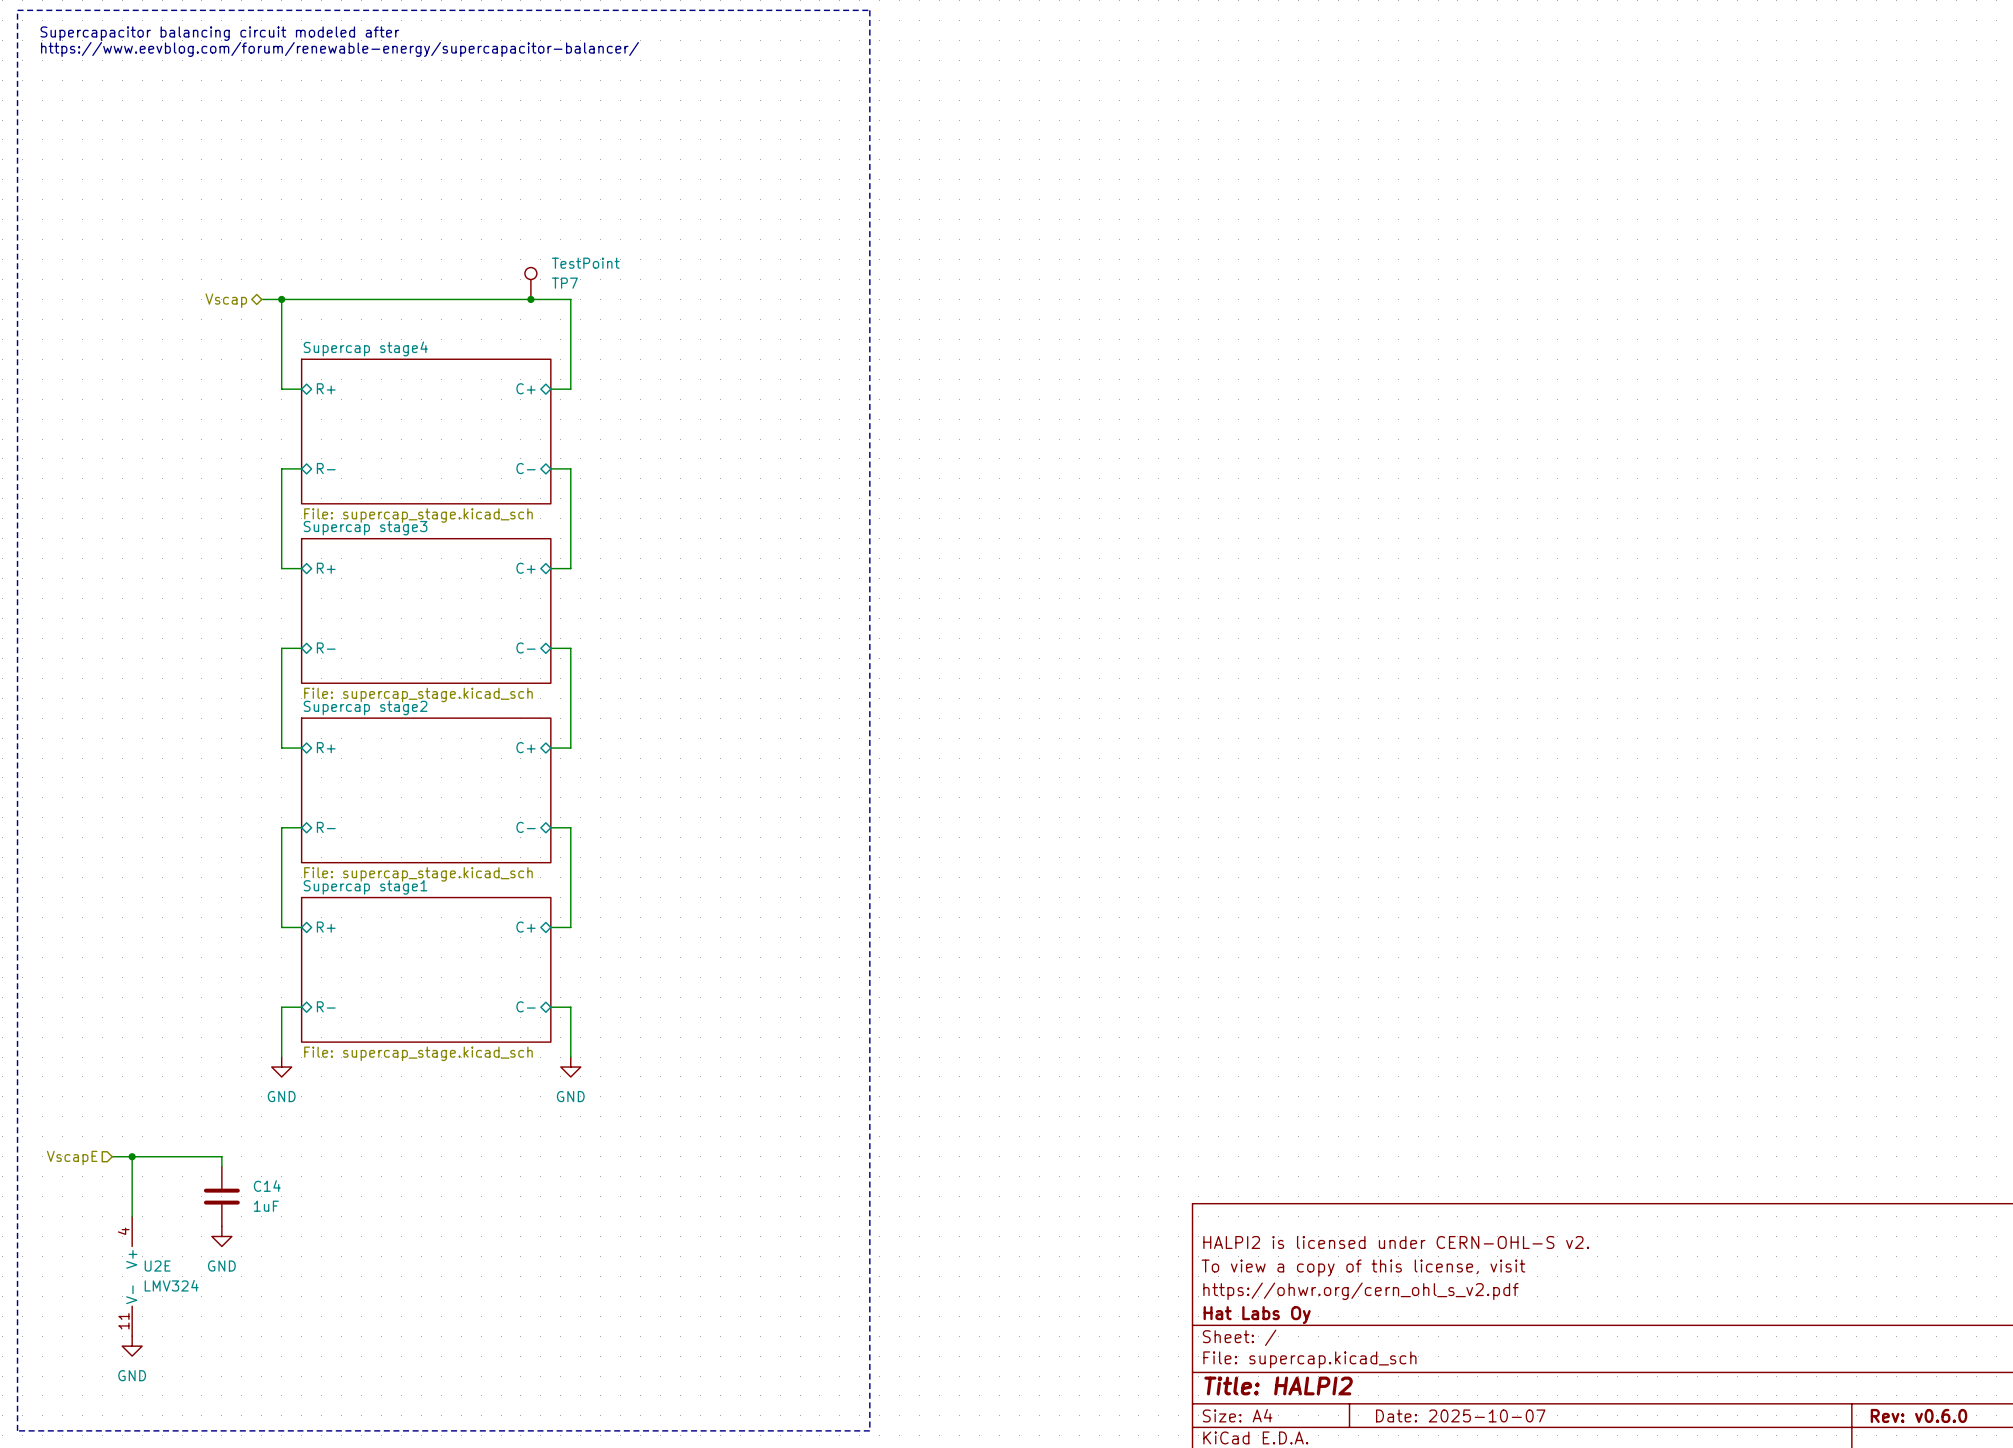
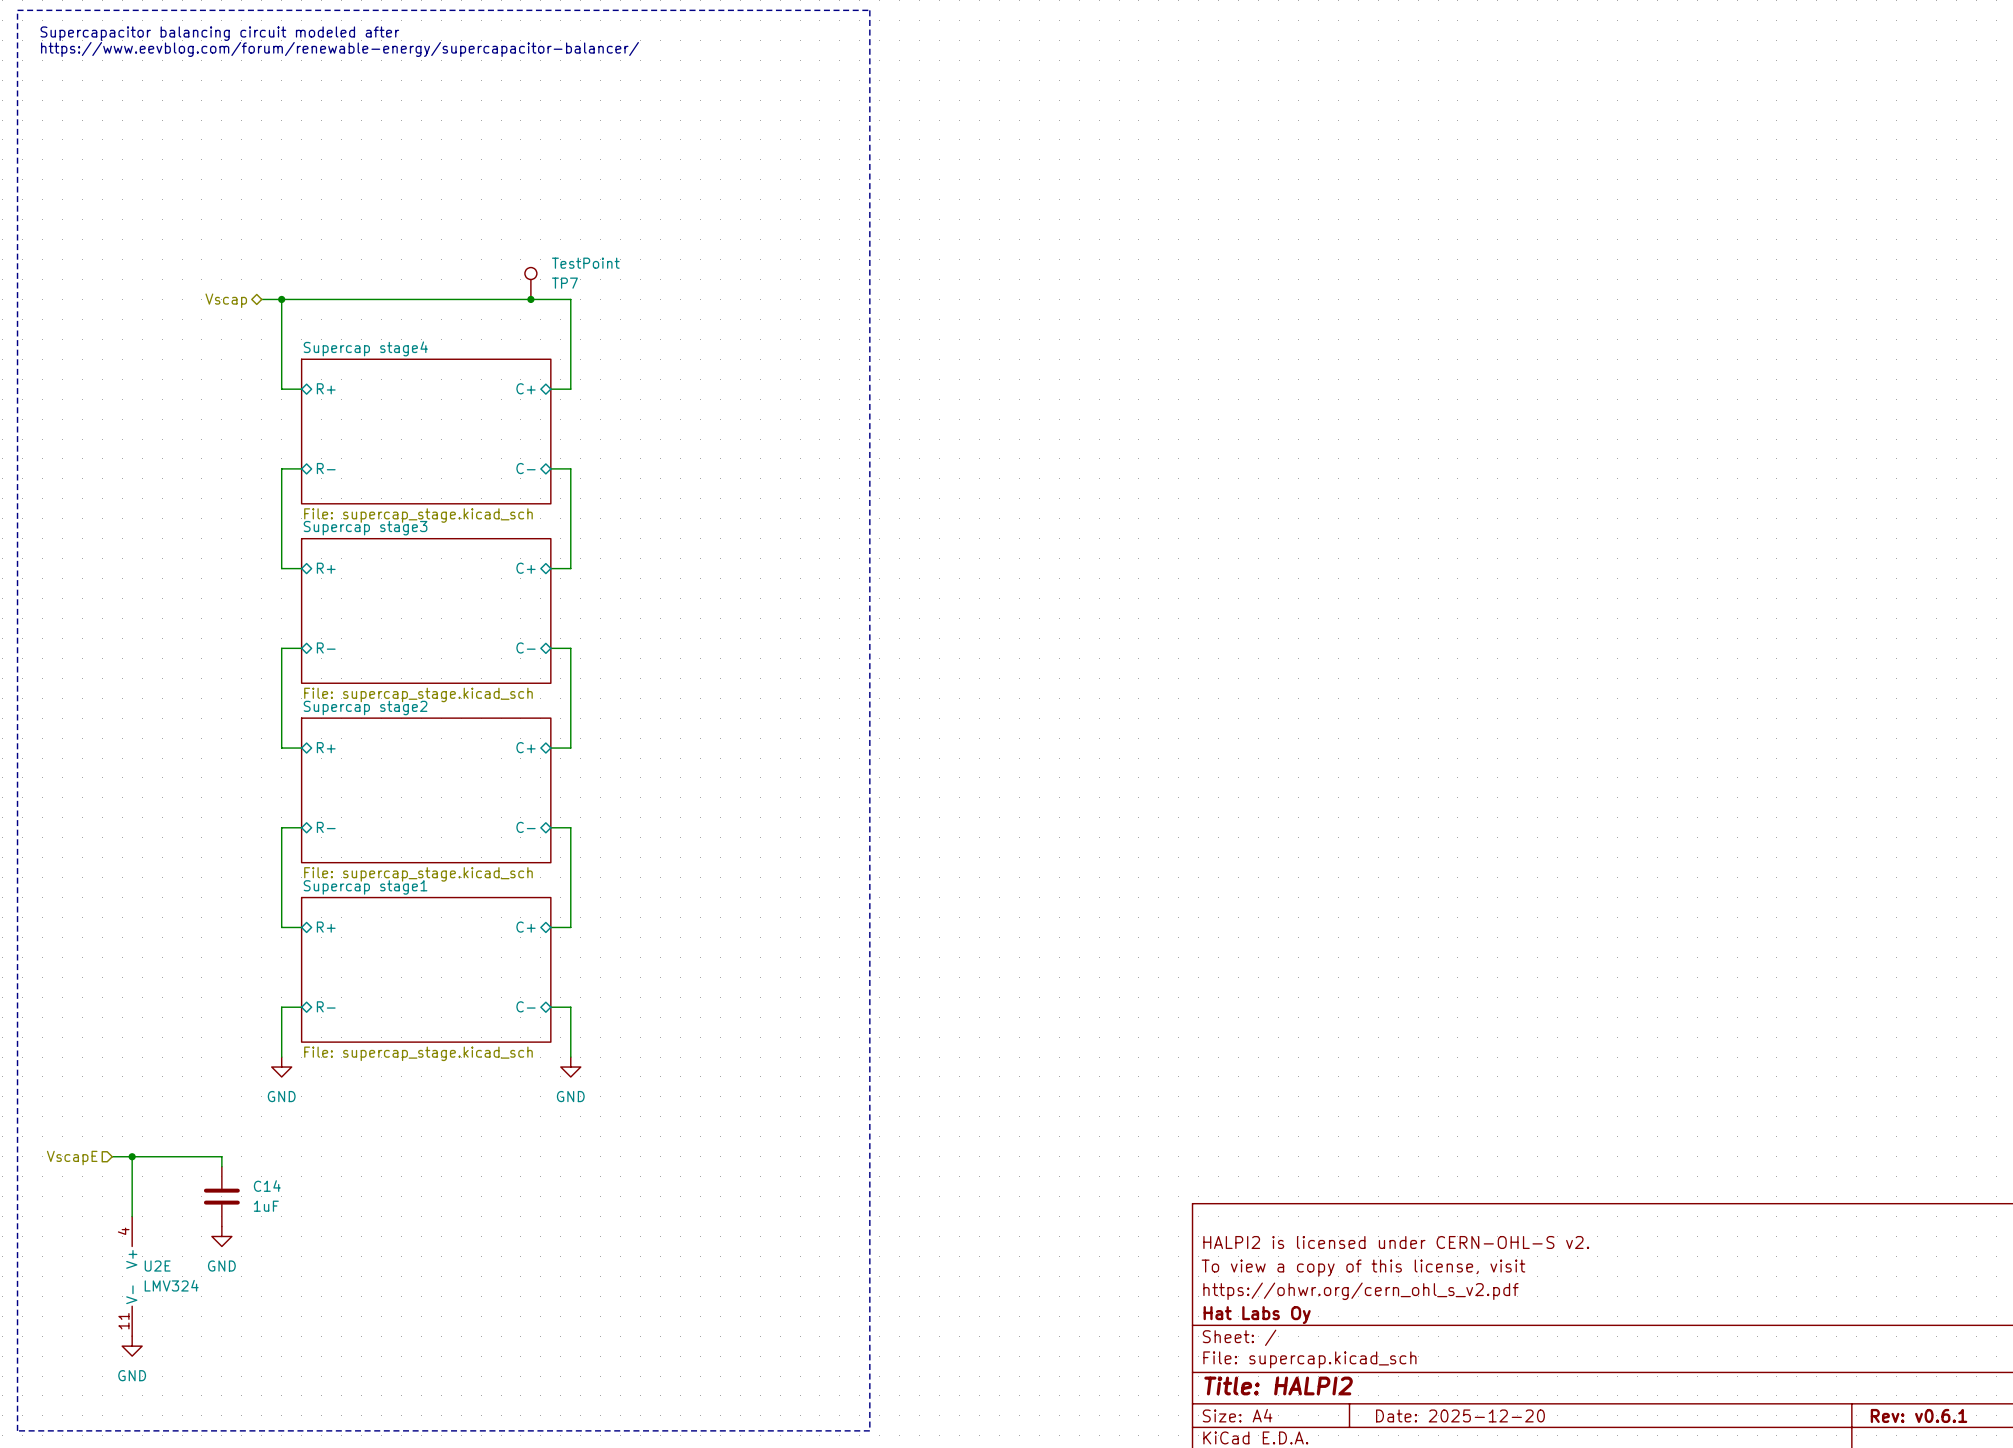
title block: Date: 2025-10-07 (1460, 1415) -> Date: 2025-12-20 (1460, 1415)
title block: Rev: v0.6.0 (1919, 1415) -> Rev: v0.6.1 (1919, 1415)

